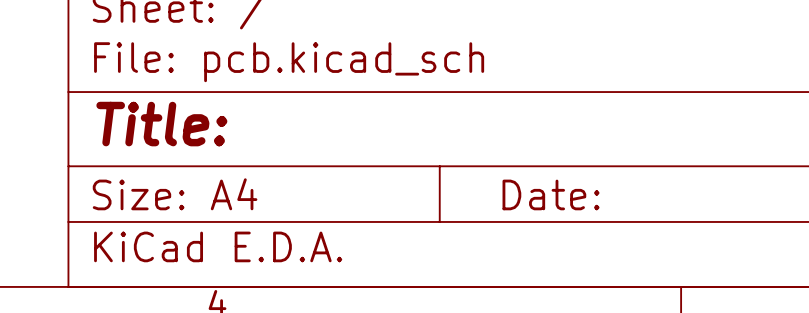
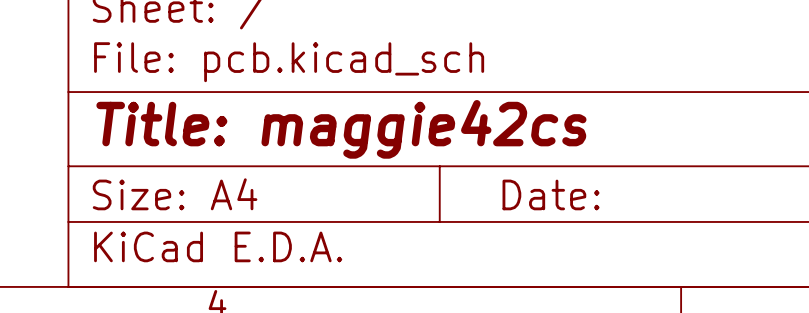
title block: Title: (161, 124) -> Title: maggie42cs (341, 129)

